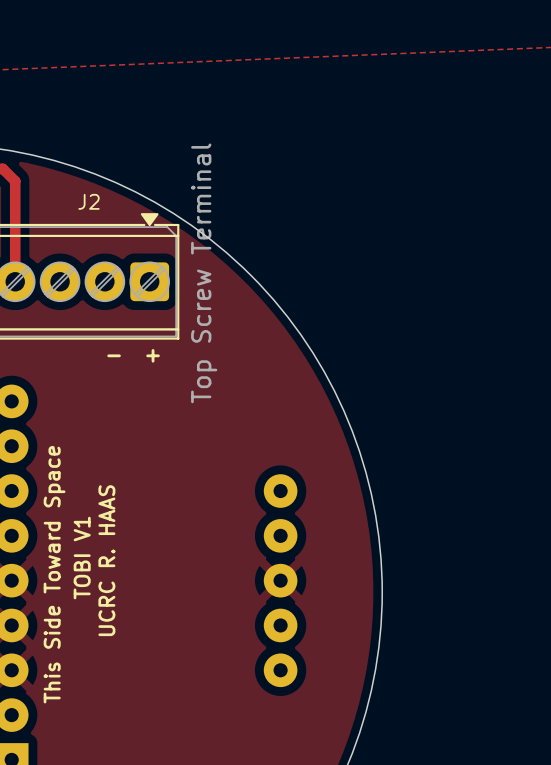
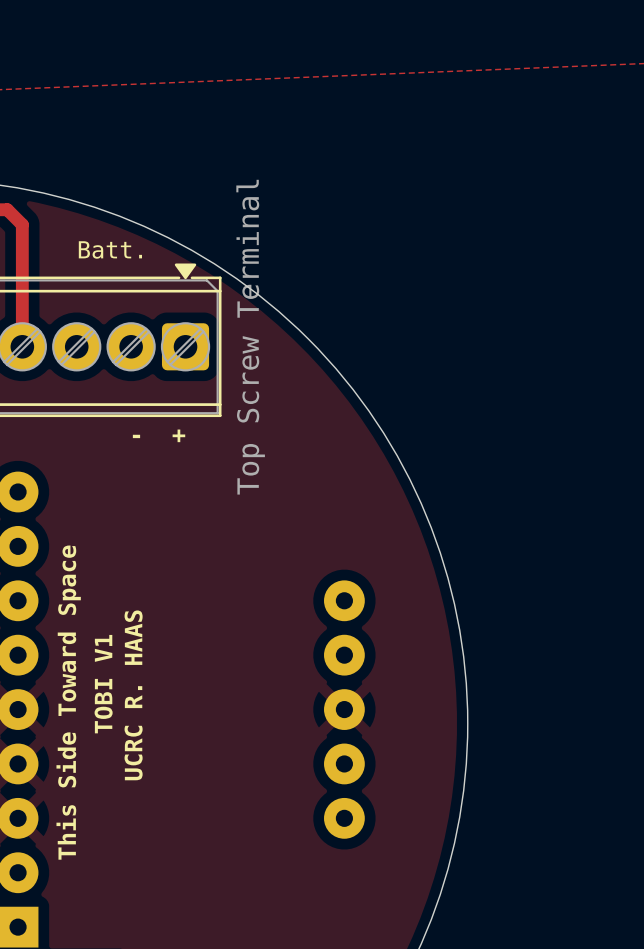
J2 name: J2 (89, 201) -> Batt. (110, 249)

